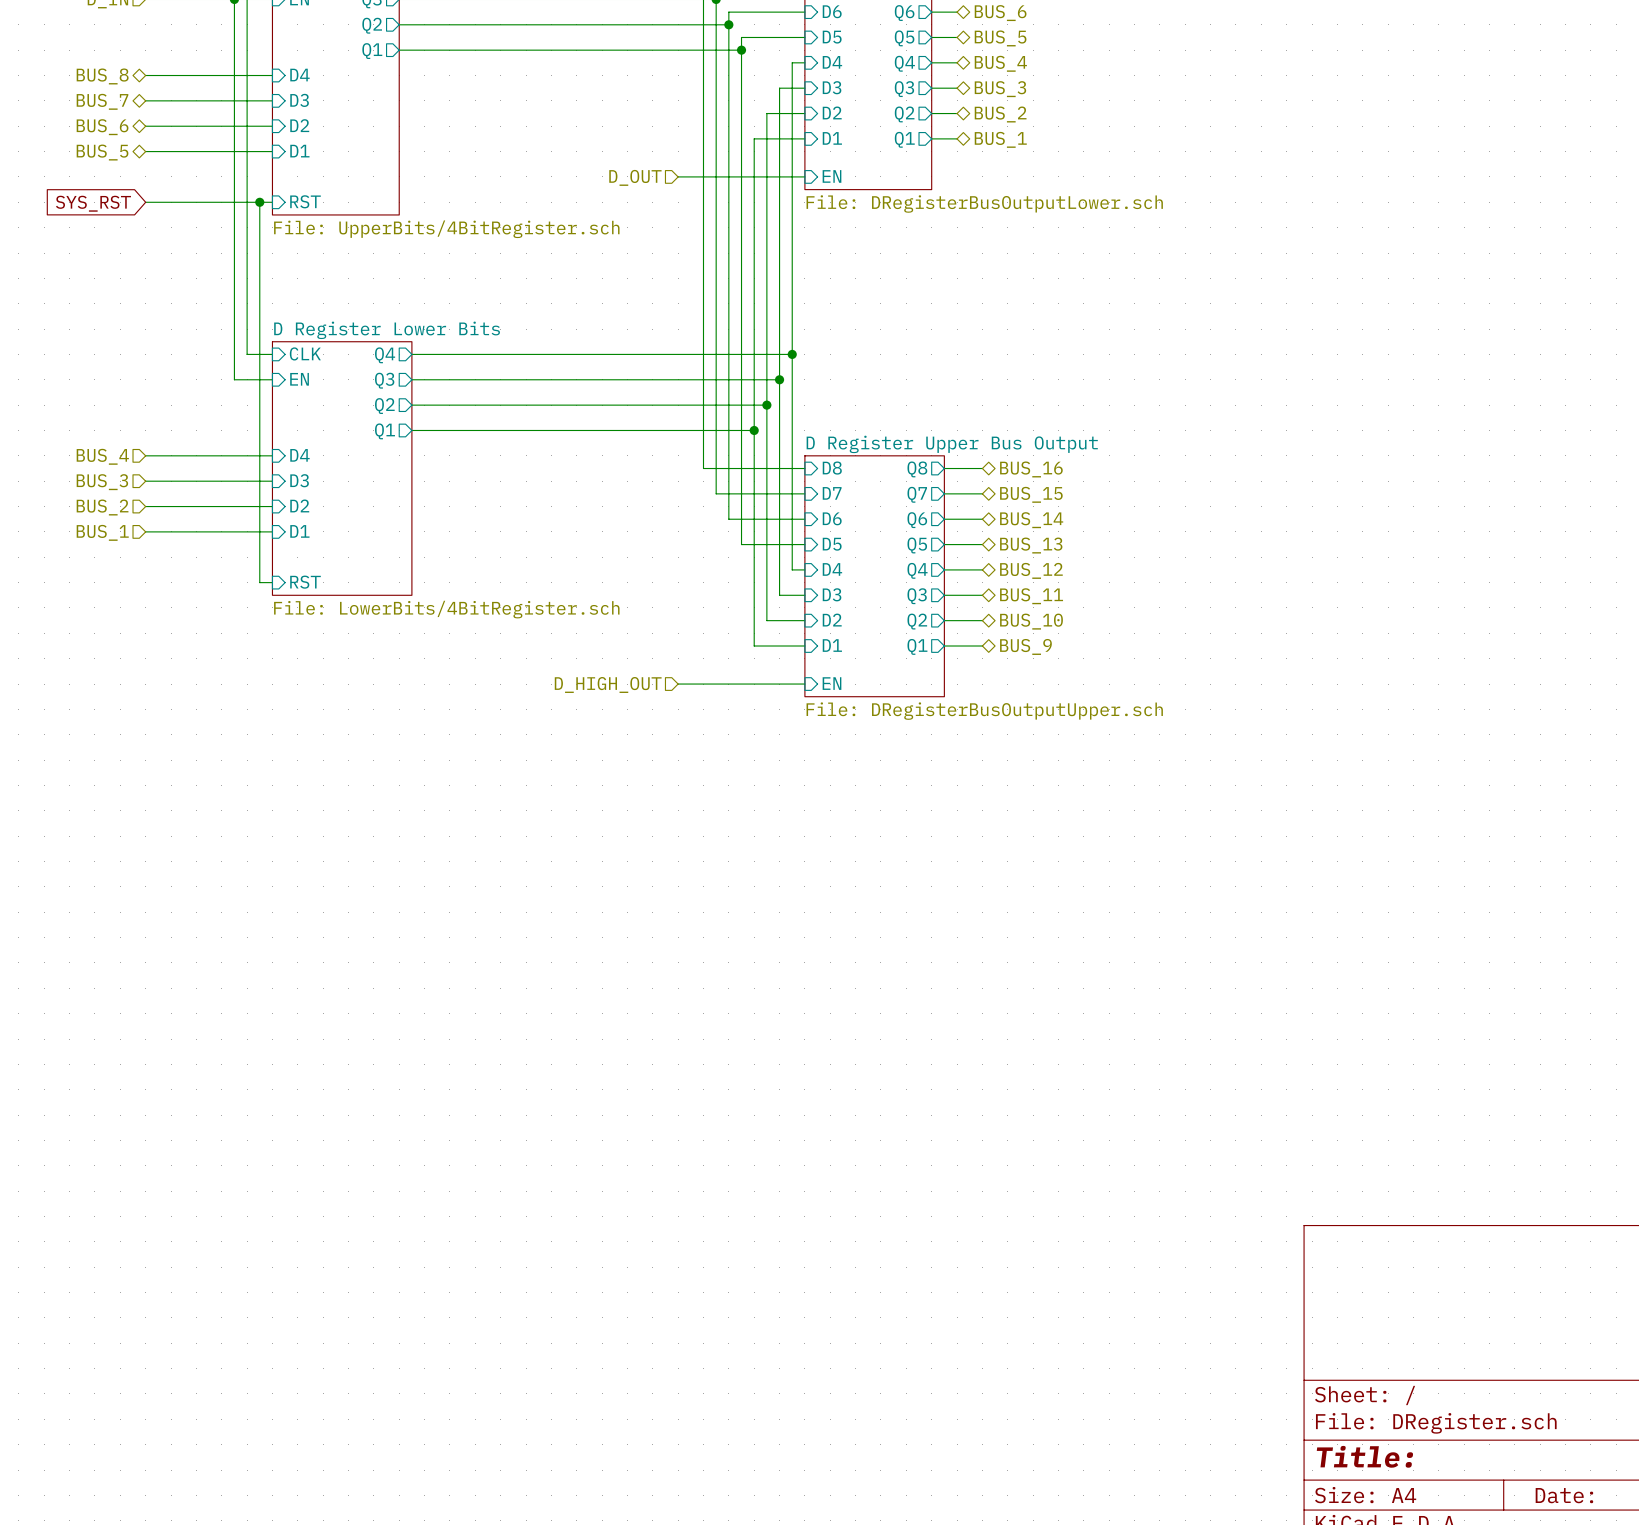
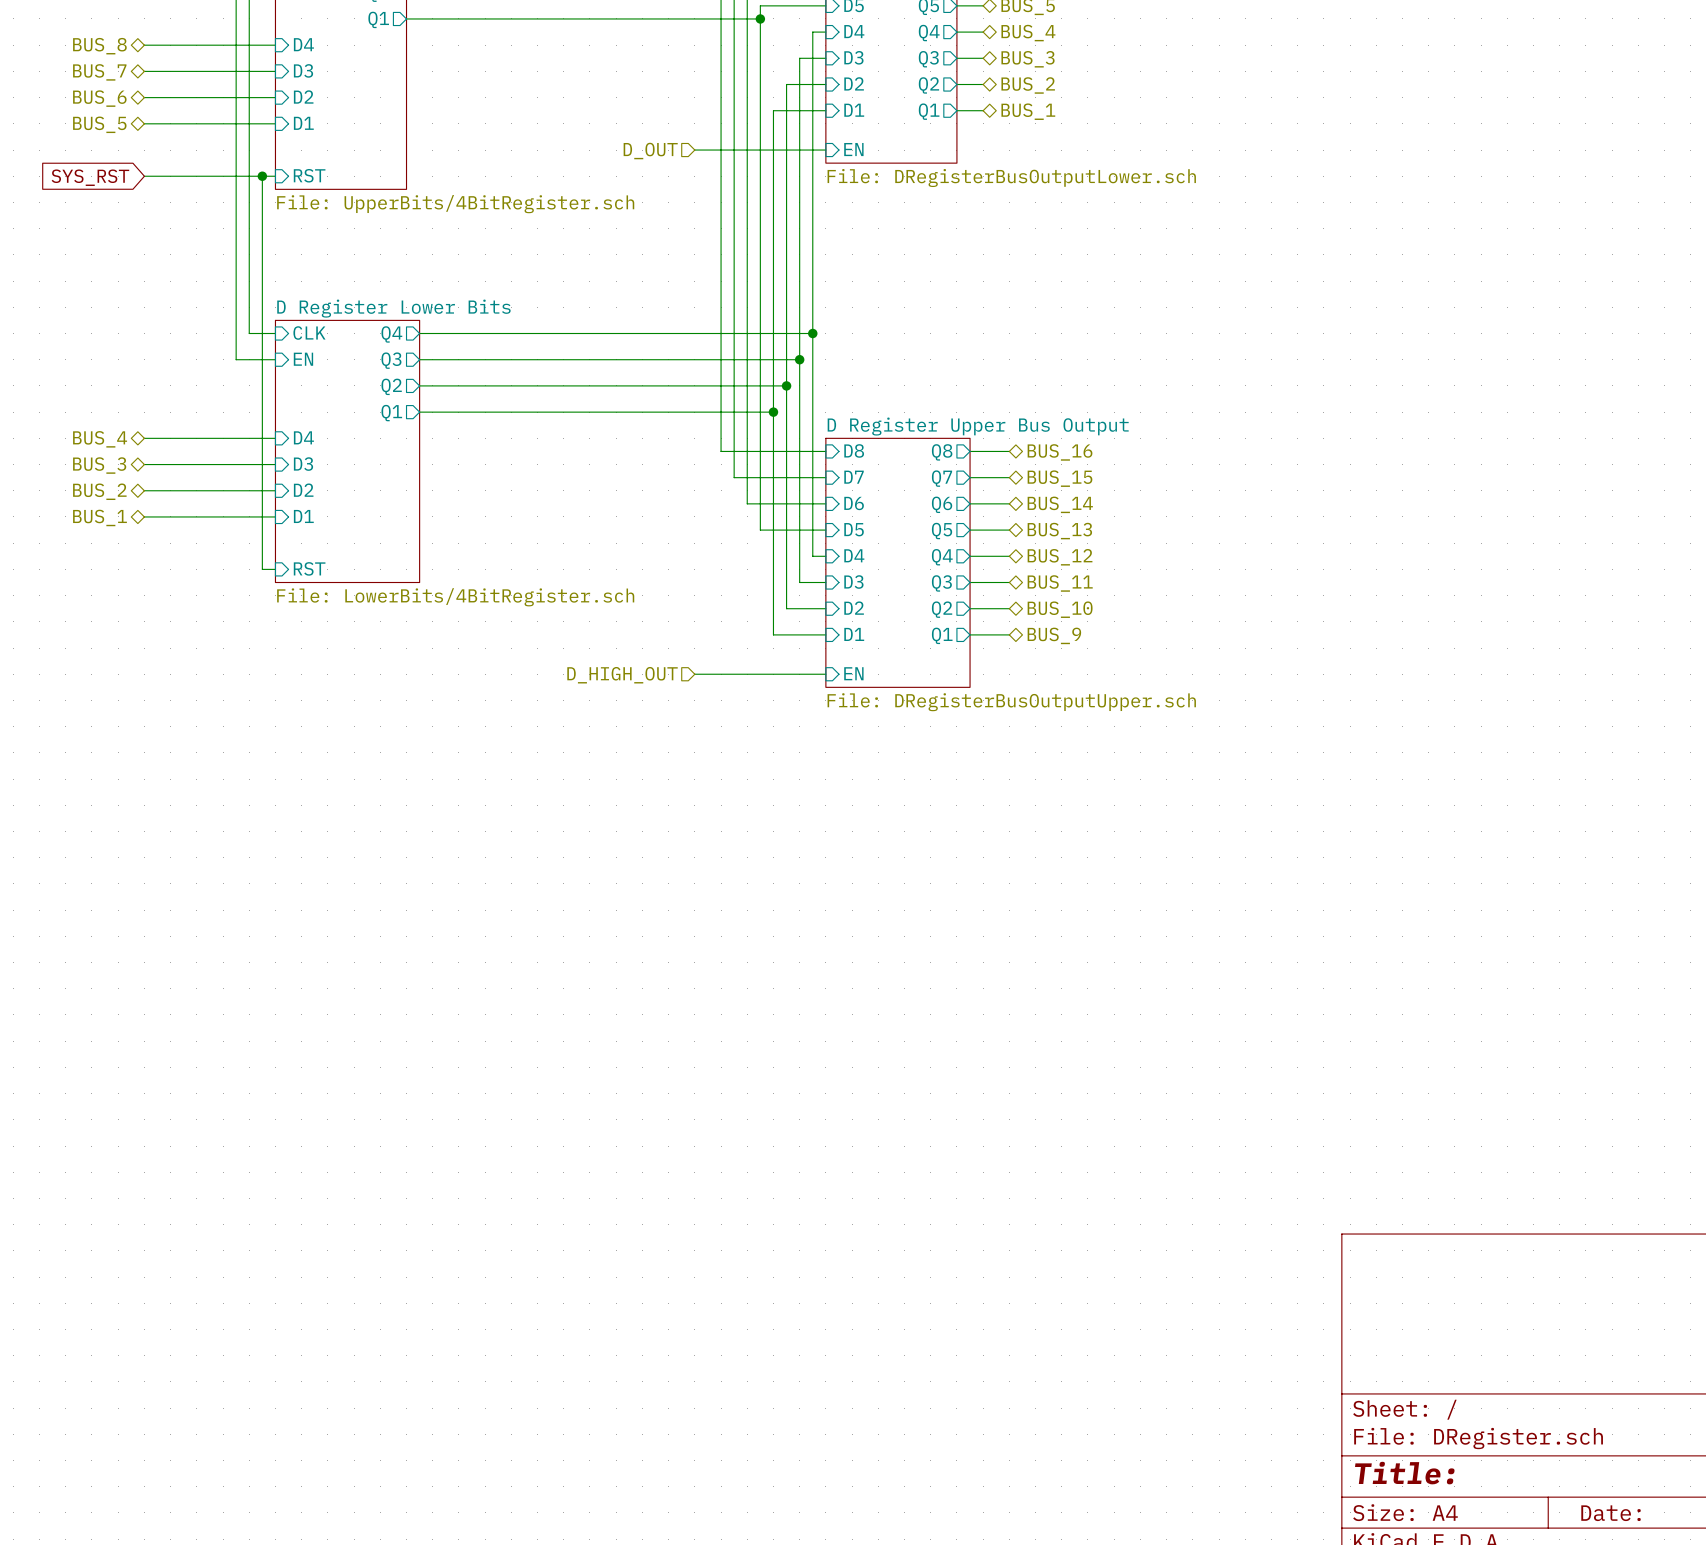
hierarchical label shape: input (102, 456) -> bidirectional (100, 439)
hierarchical label shape: input (102, 482) -> bidirectional (99, 465)
hierarchical label shape: input (102, 507) -> bidirectional (99, 491)
hierarchical label shape: input (102, 532) -> bidirectional (99, 517)

